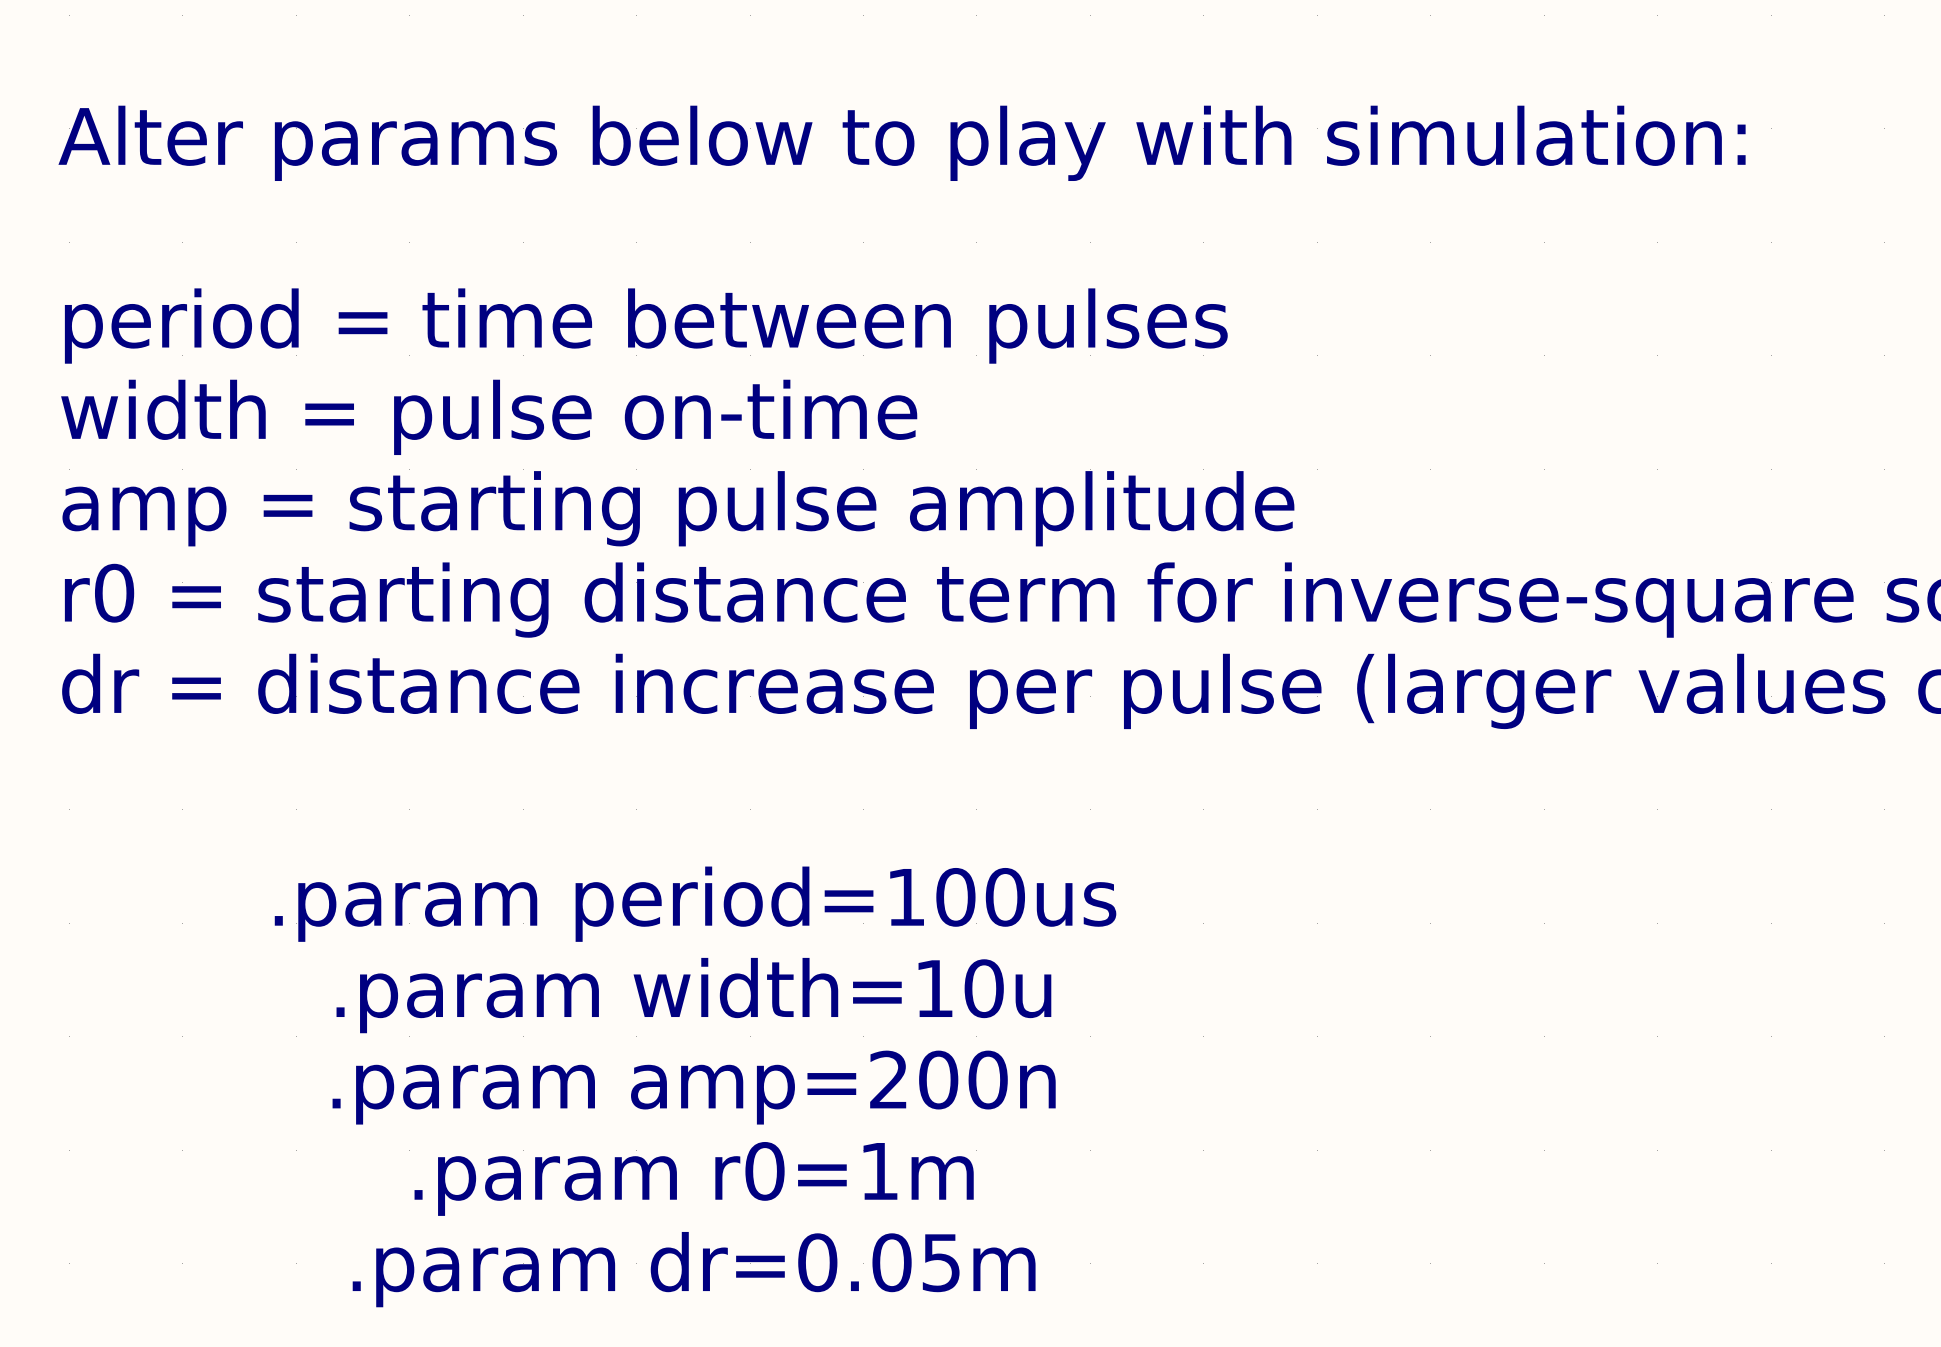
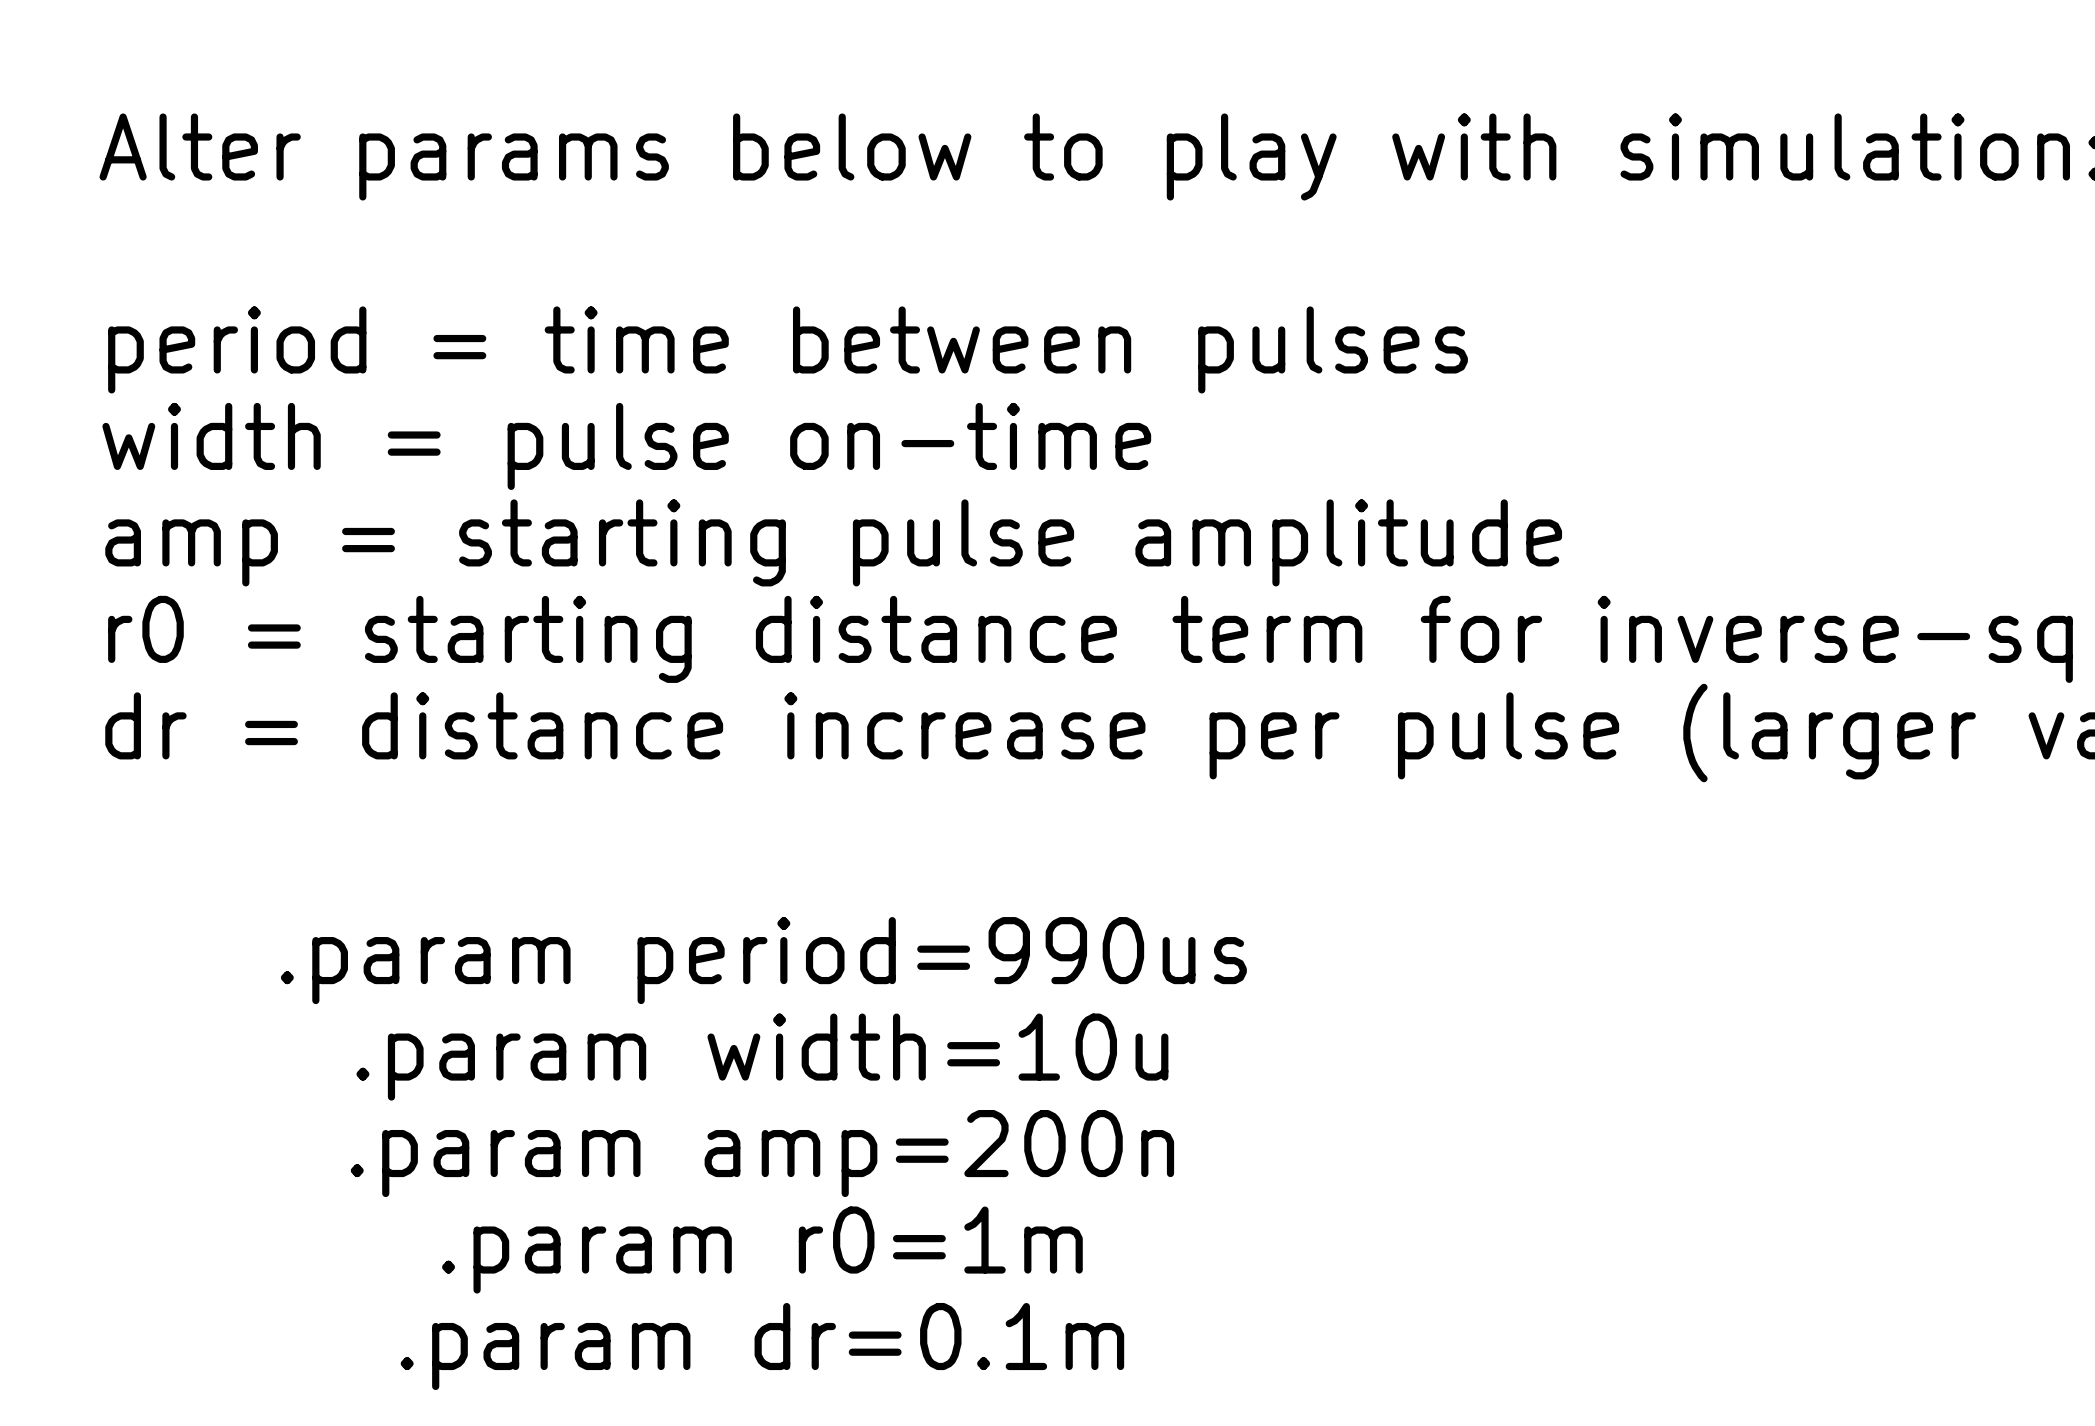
text: .param period=100us (695, 904) -> .param period=990us (763, 960)
text: .param dr=0.05m (694, 1269) -> .param dr=0.1m (762, 1346)

